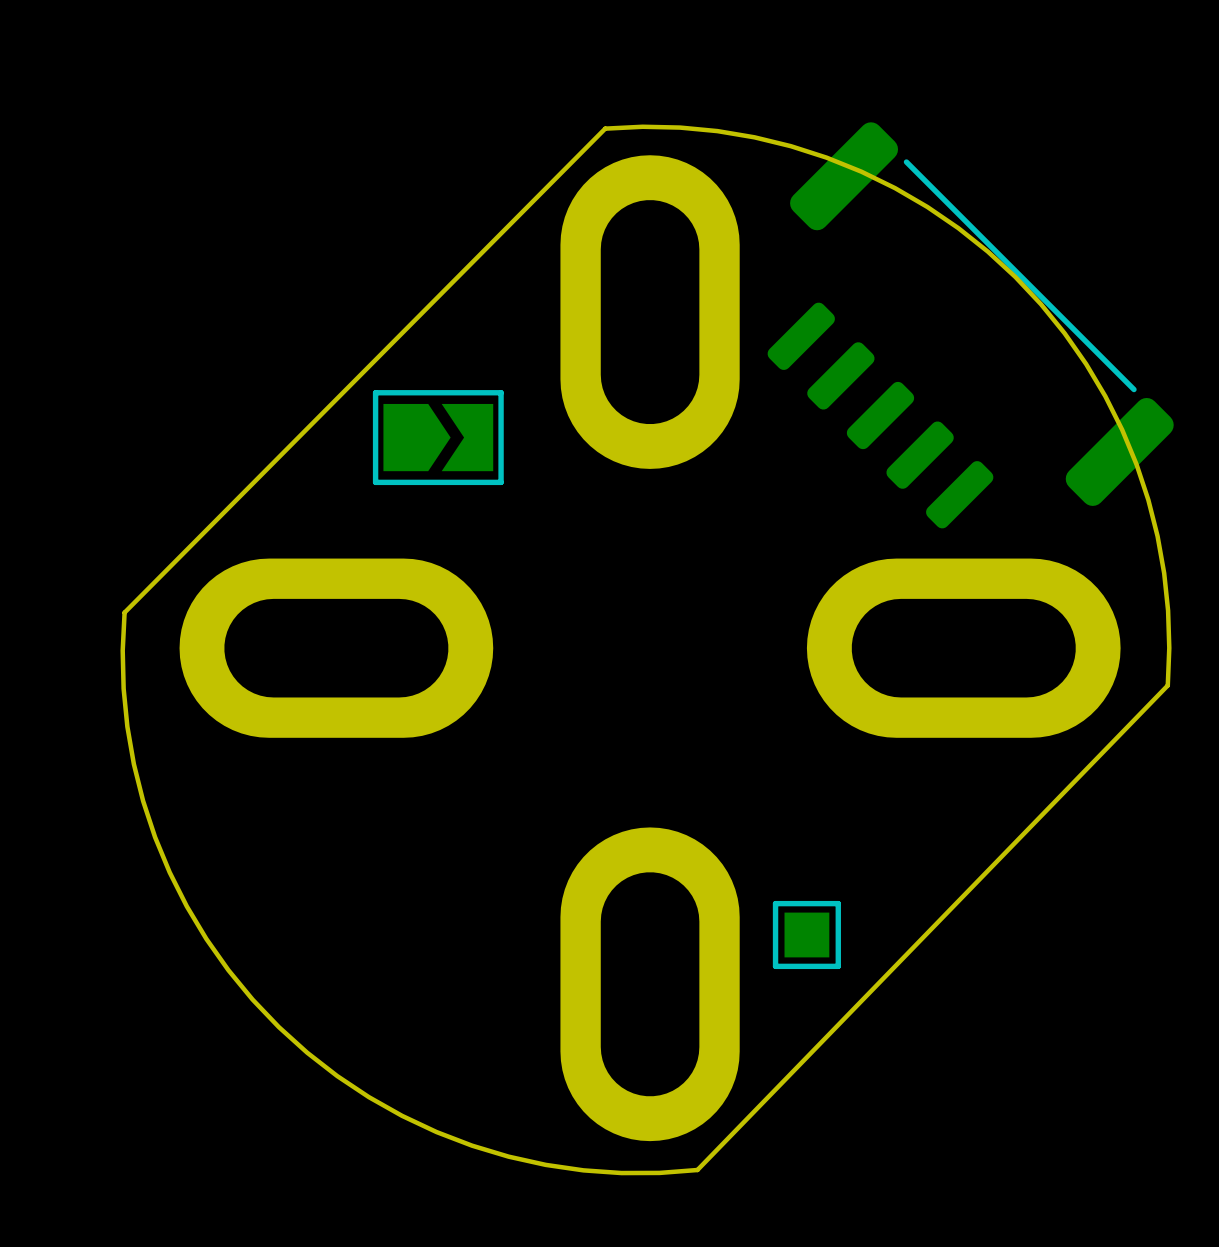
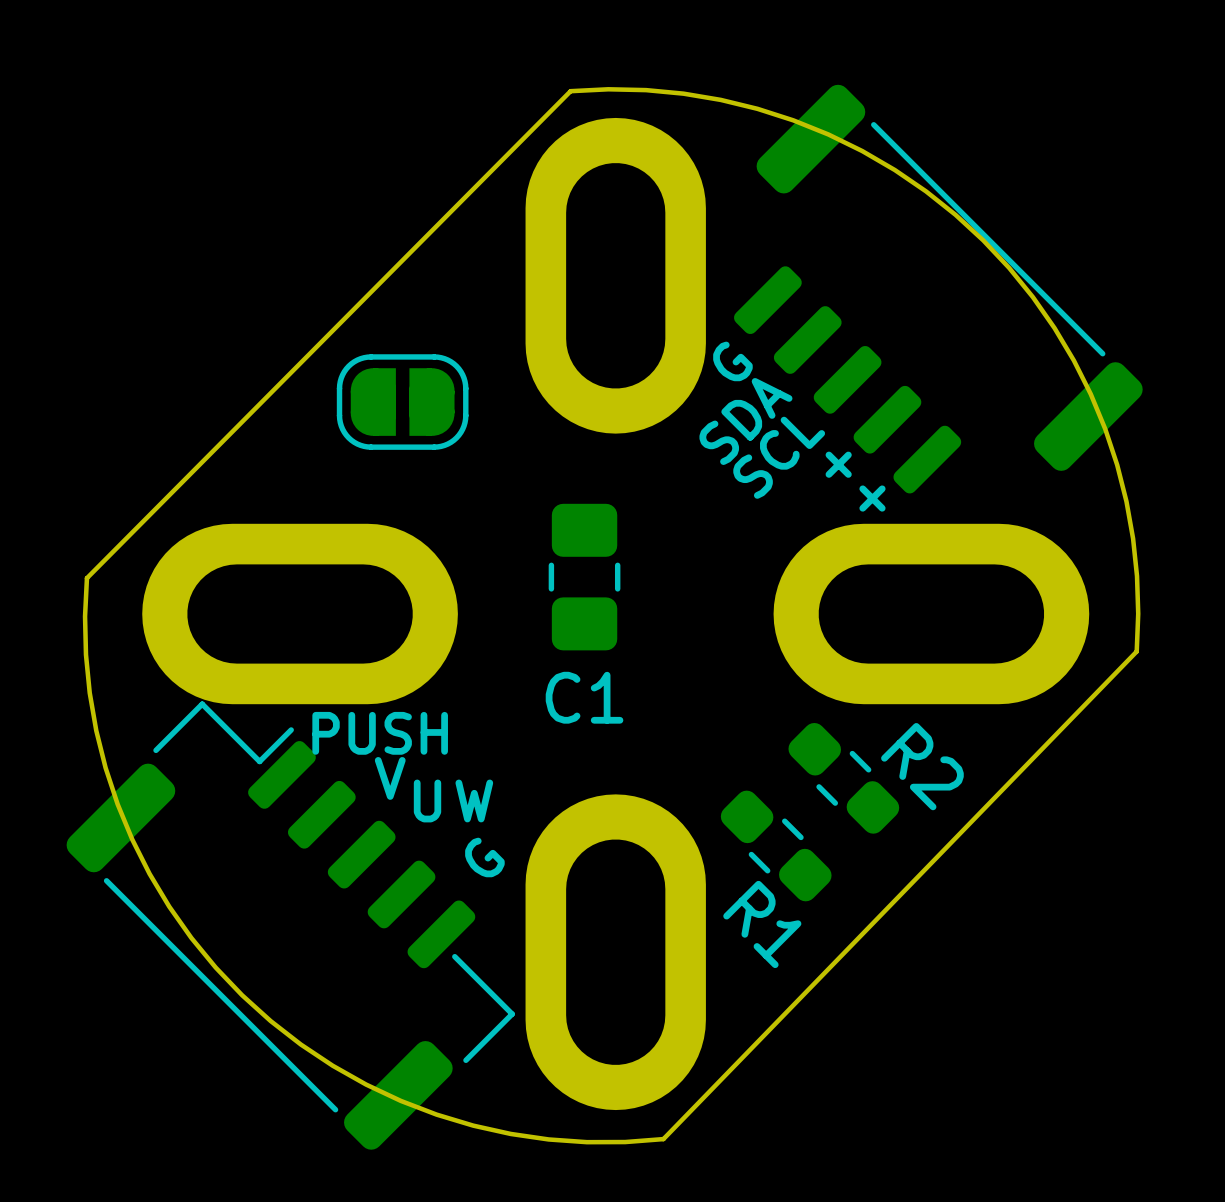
part footprint: [372, 390, 504, 486] -> [336, 354, 469, 450]
text: none -> G (732, 361)
text: none -> SDA (745, 421)
text: none -> SCL (779, 457)
text: none -> + (838, 464)
text: none -> + (872, 498)
C1: none -> (584, 577)
text: none -> PUSH (380, 733)
text: none -> V (390, 778)
R2: none -> (843, 778)
text: none -> U (427, 800)
text: none -> W (474, 800)
R1: none -> (776, 845)
text: none -> G (484, 857)
part: (806, 934) -> none
part: none -> (290, 925)

